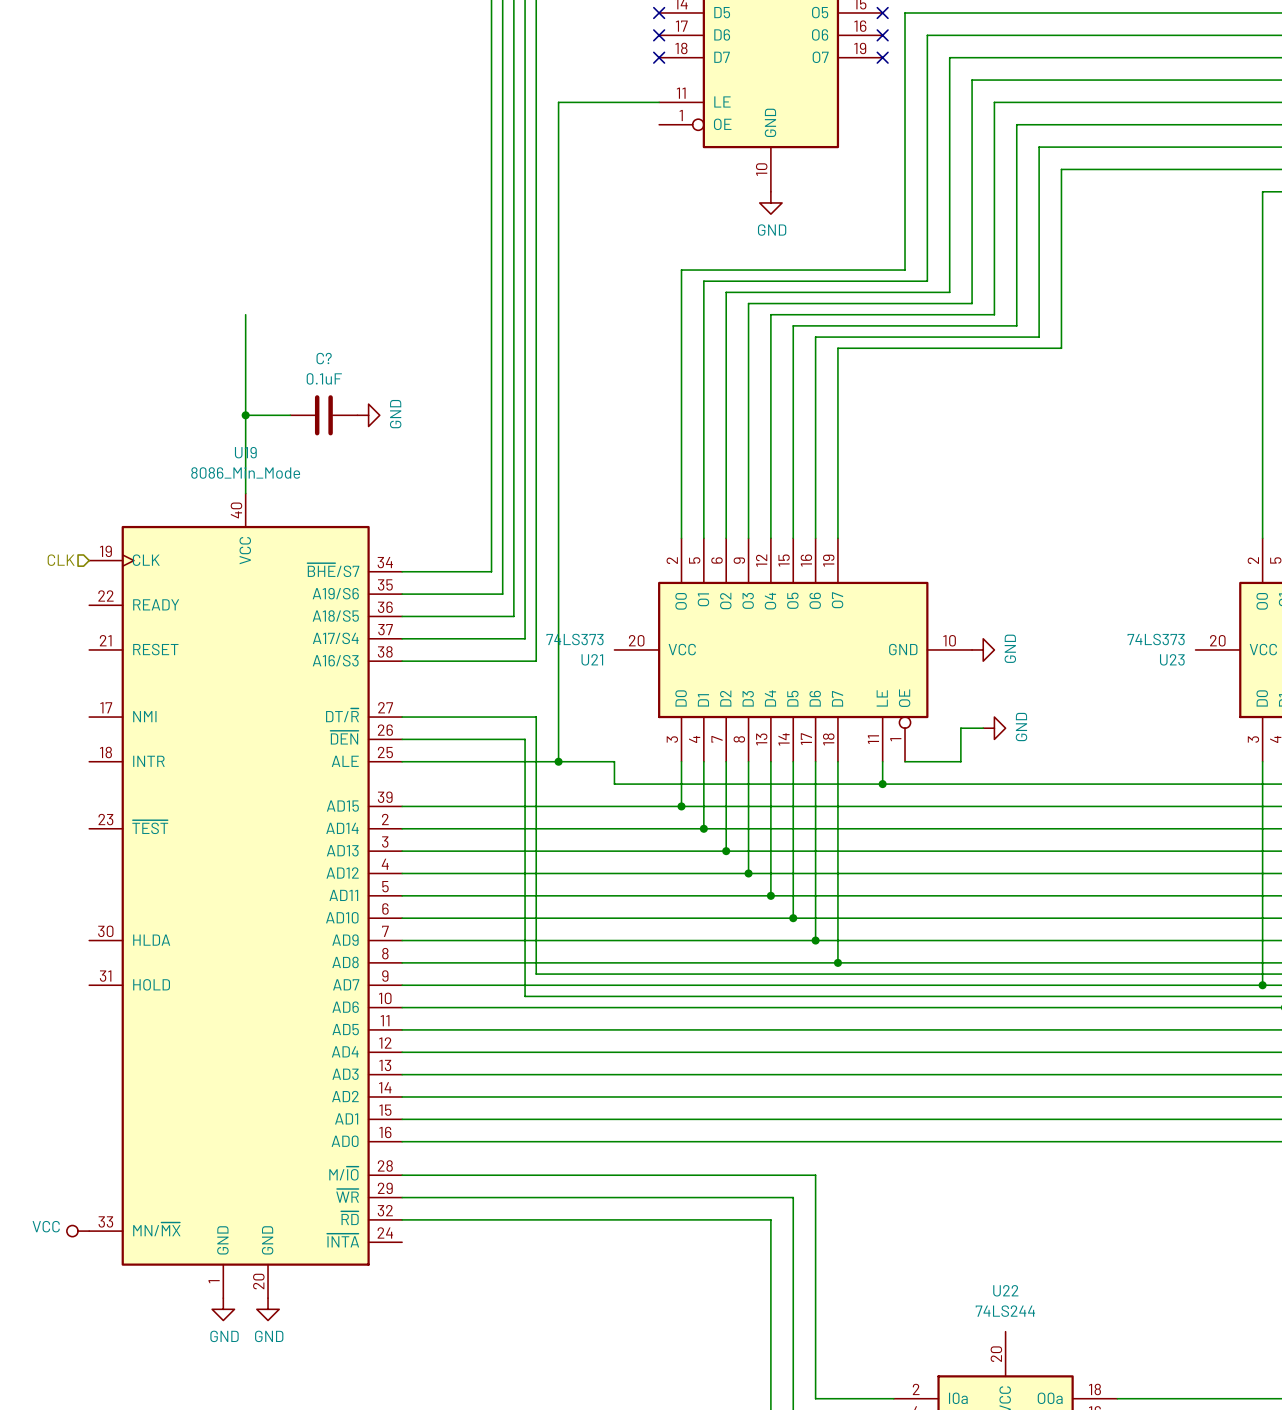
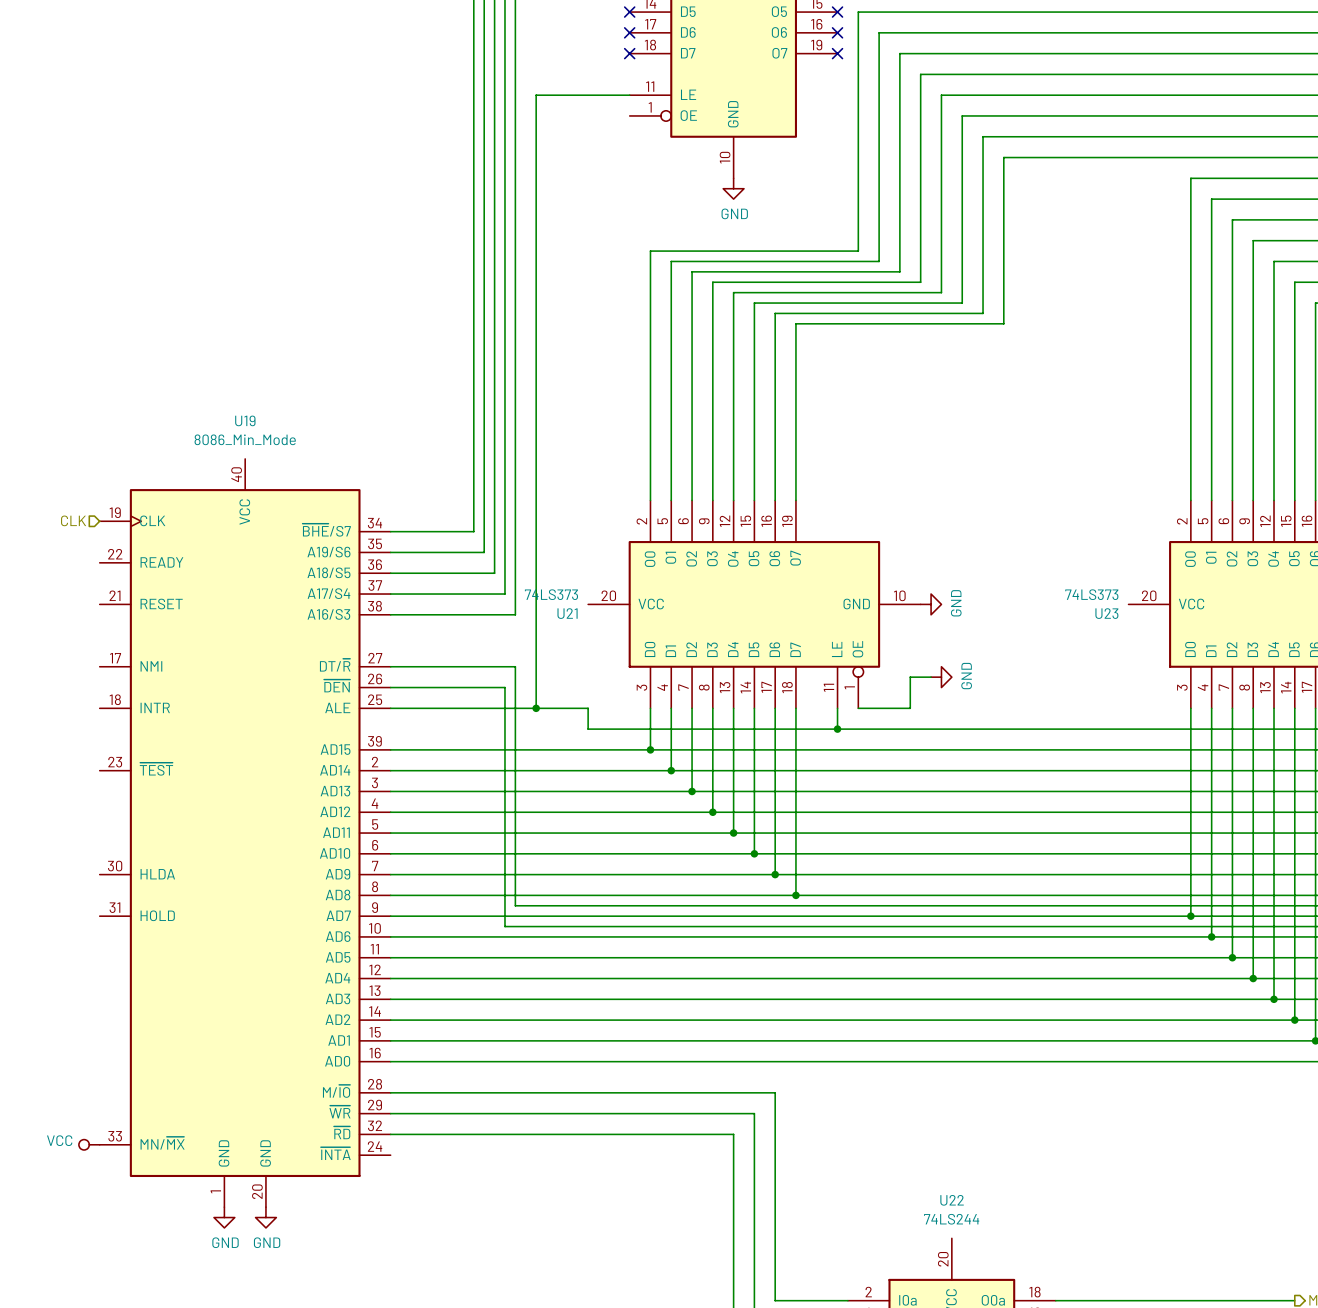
wire: (245, 314) (245, 493) -> none
wire: (245, 415) (290, 415) -> none
junction: (245, 415) -> none
C?: 0.1uF (323, 415) -> none
power symbol: GND (368, 415) -> none

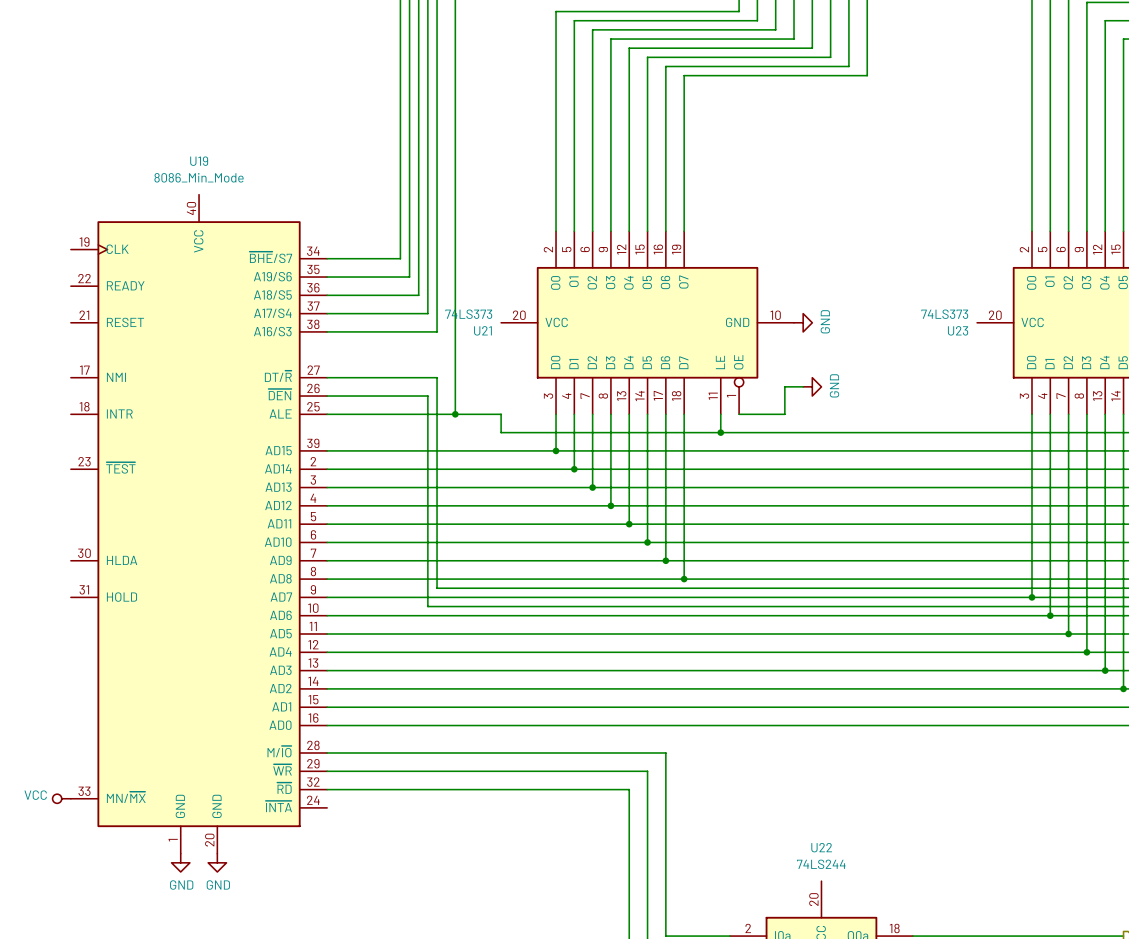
hierarchical label: CLK (73, 520) -> none

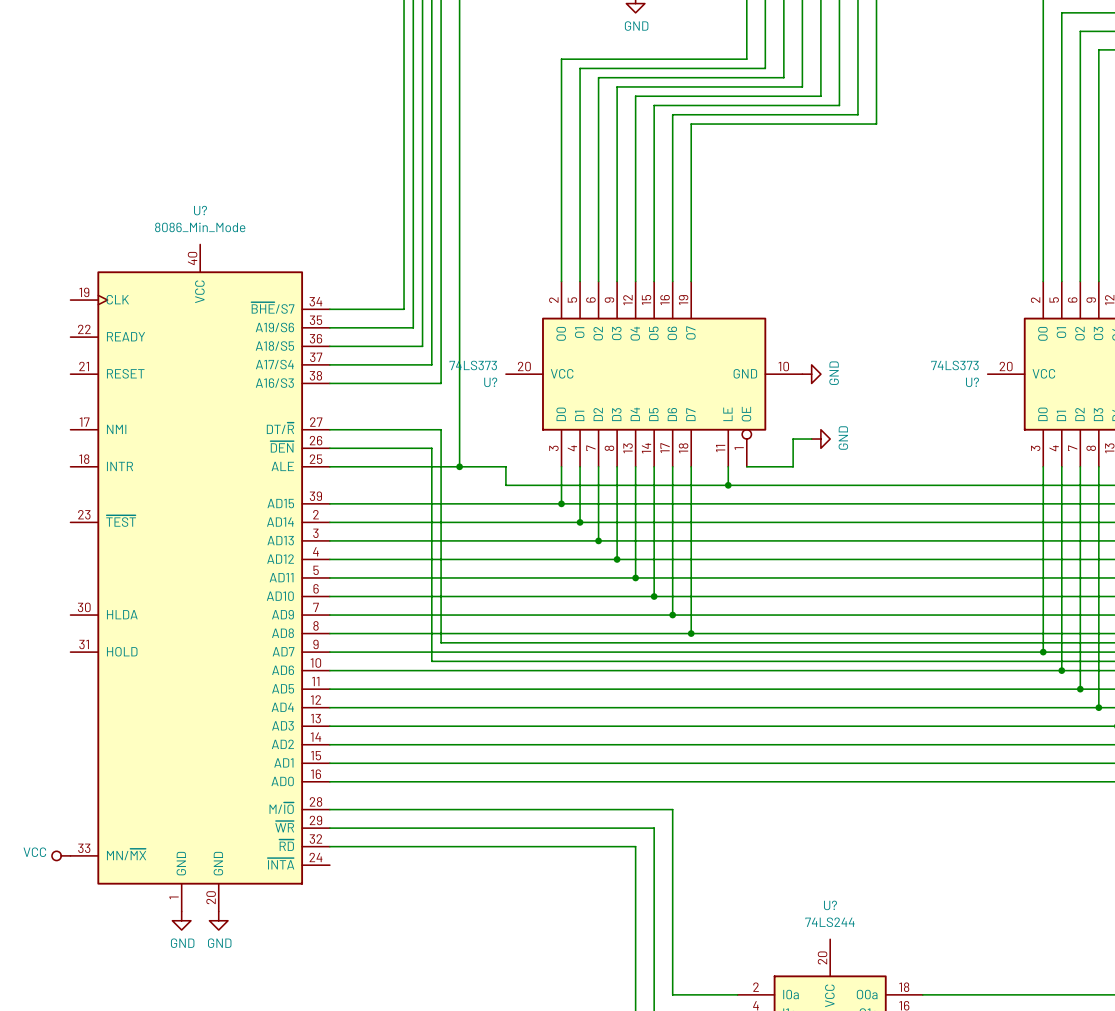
U19 name: U19 (199, 161) -> U? (200, 210)
U21 name: U21 (482, 330) -> U? (490, 382)
U23 name: U23 (958, 330) -> U? (972, 382)
U22 name: U22 (821, 847) -> U? (830, 905)

